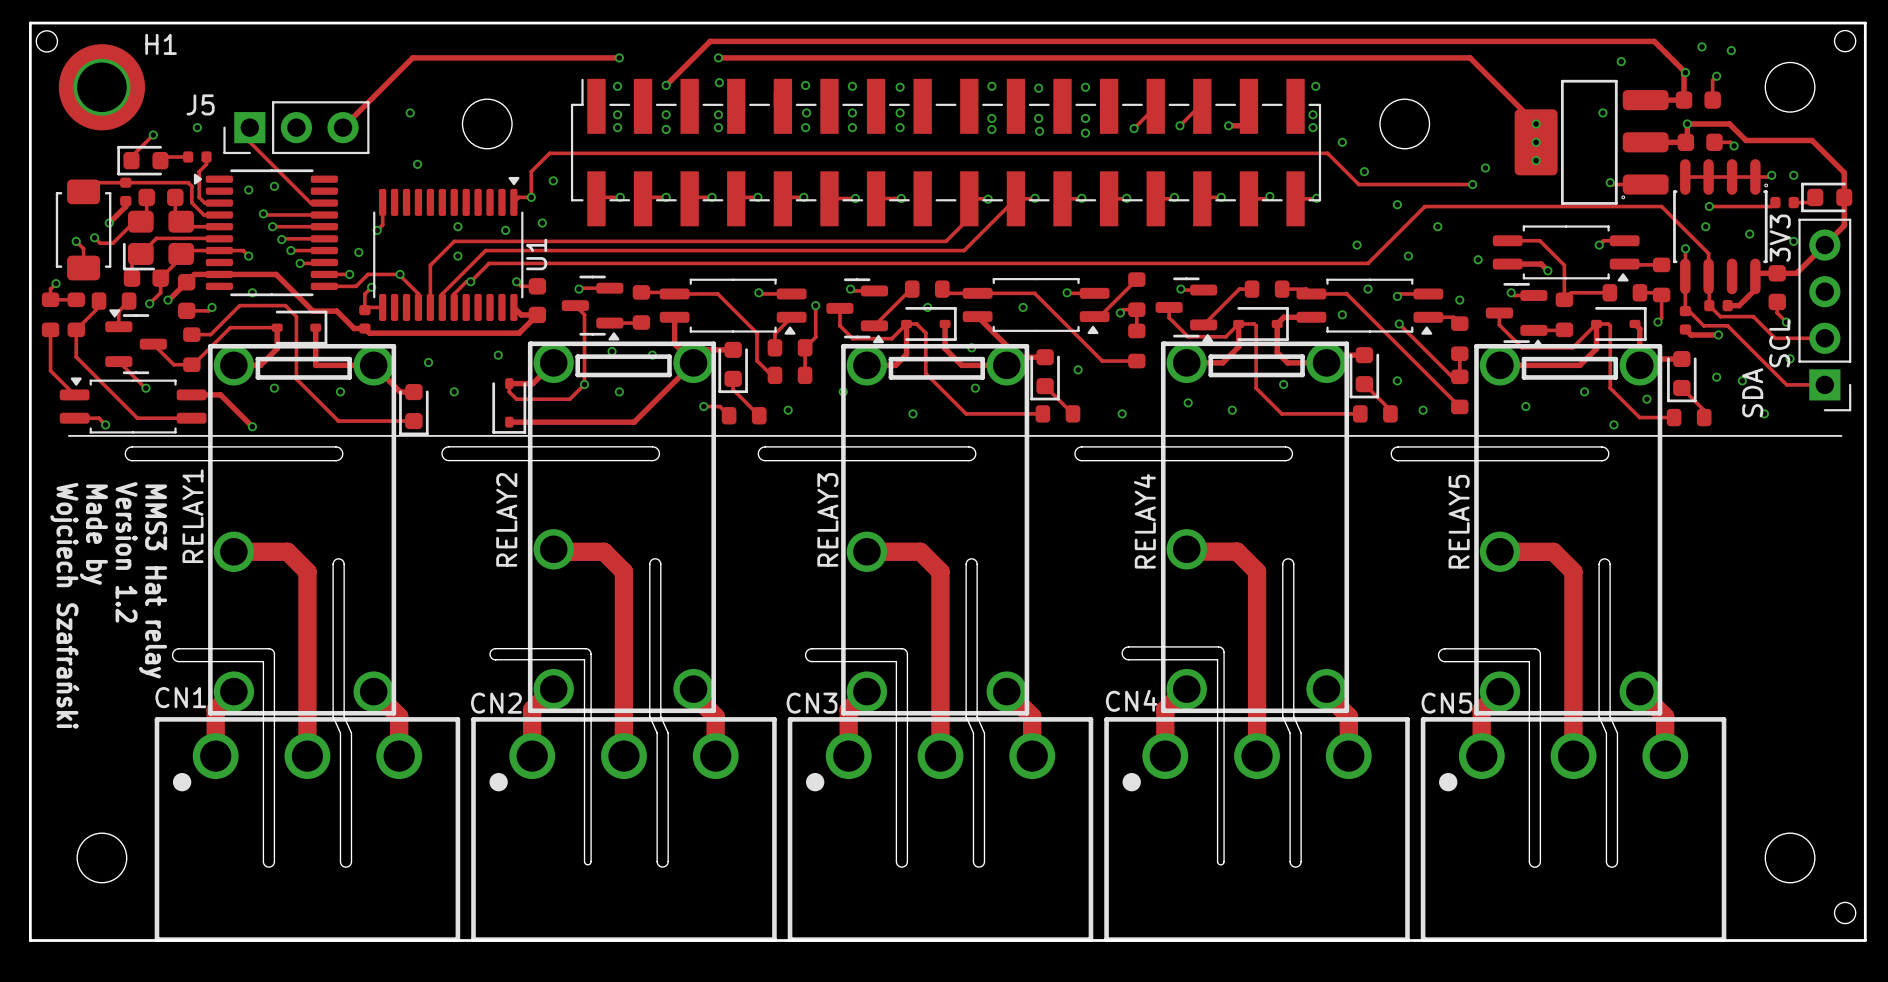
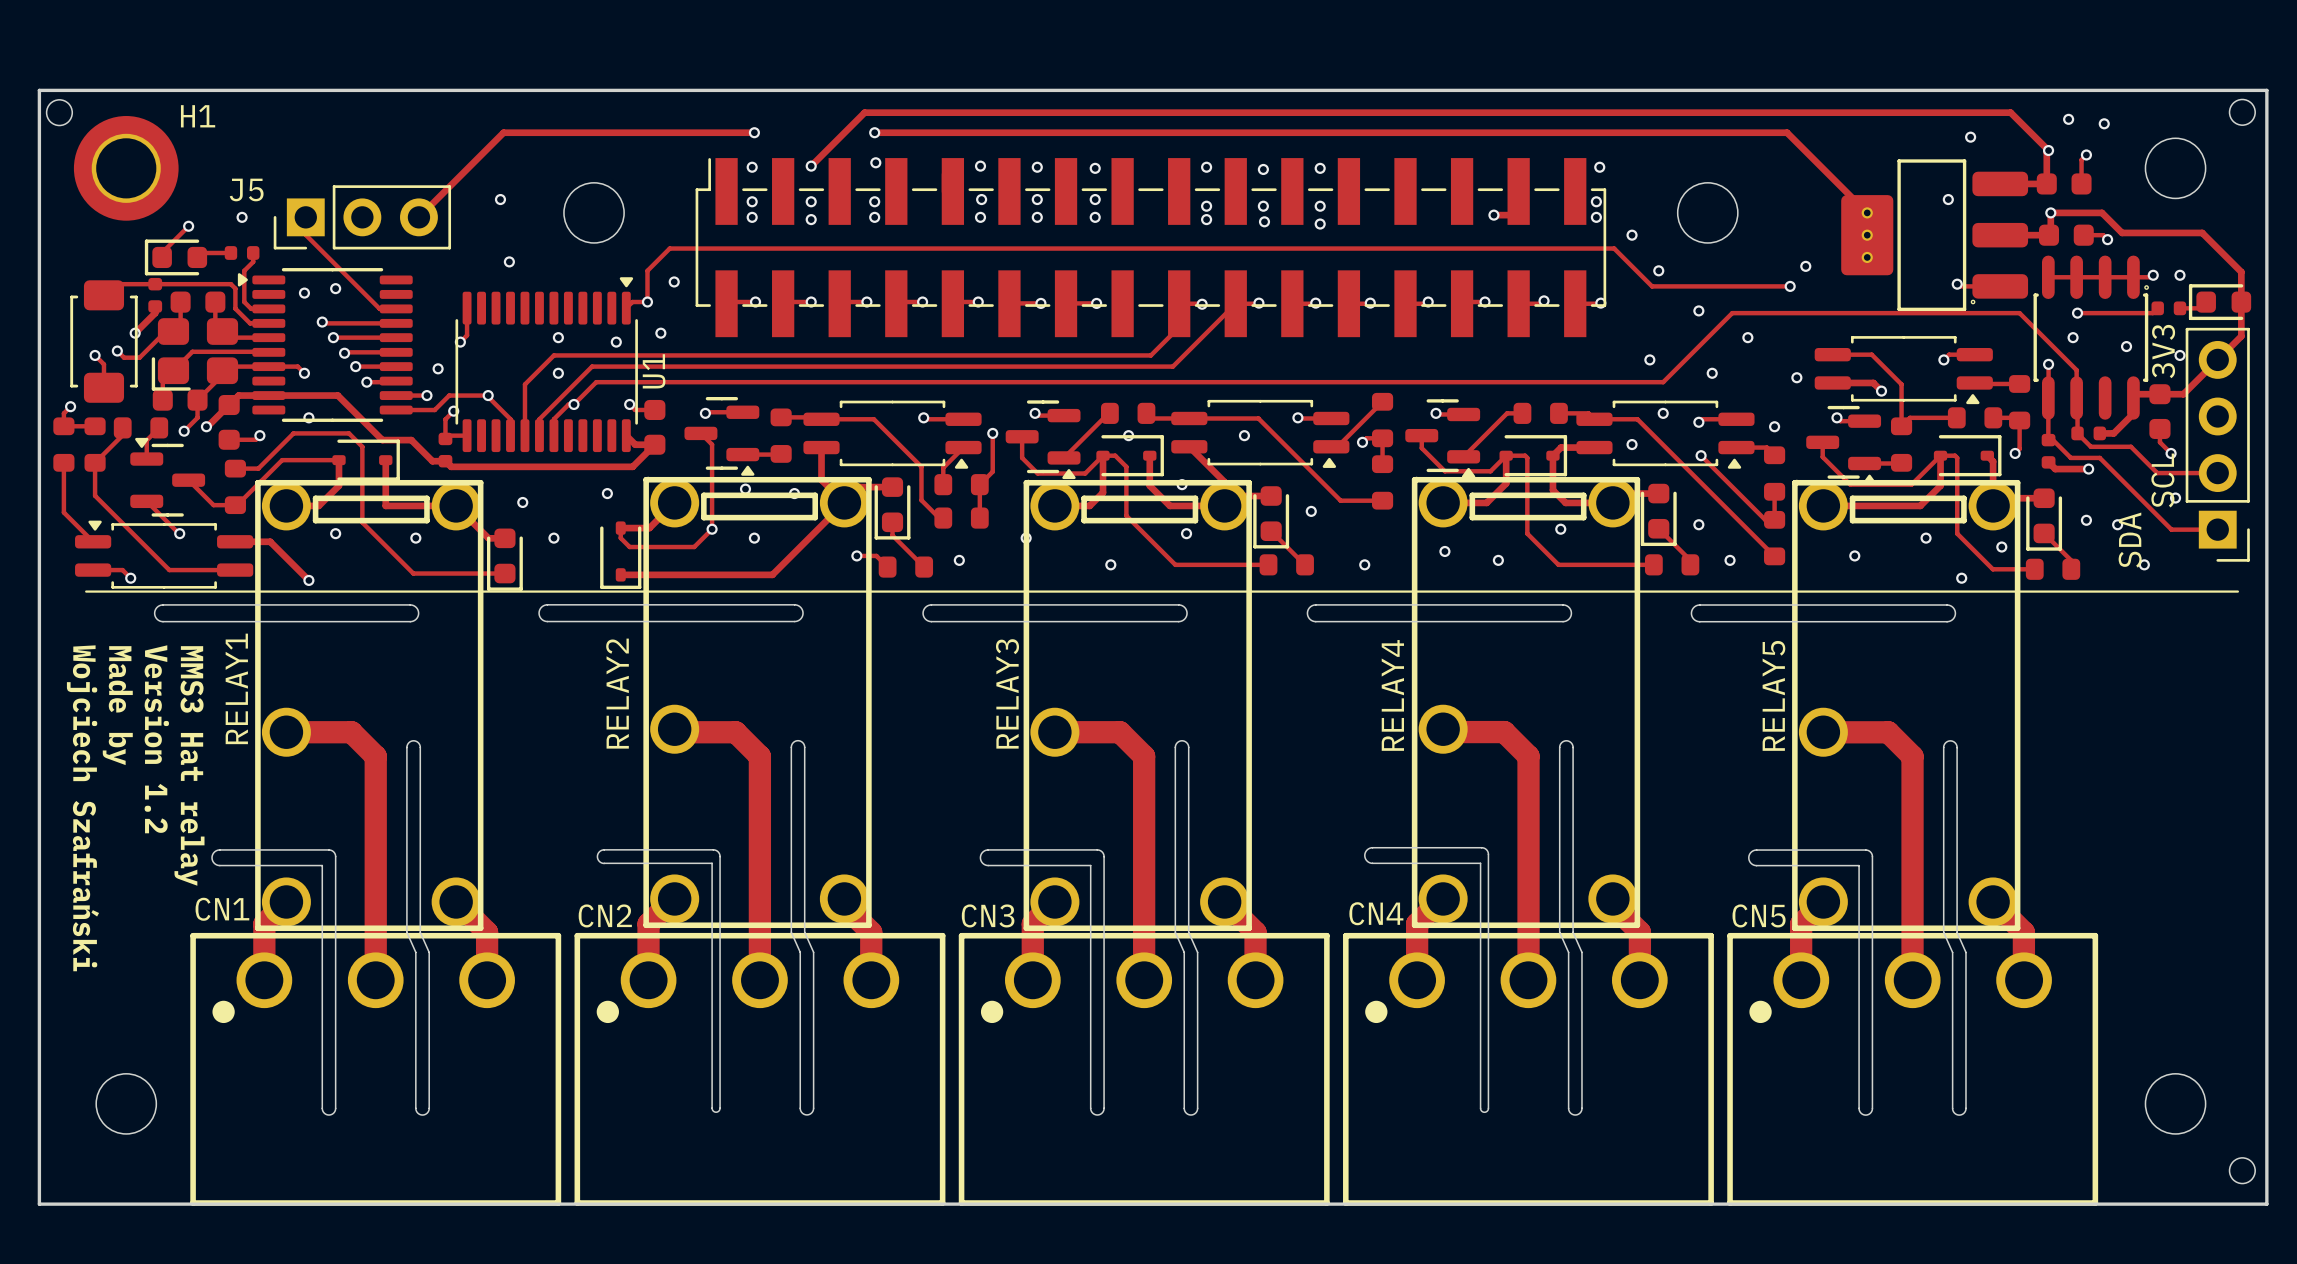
track: (1155, 106) (1134, 128) -> none
track: (1202, 106) (1199, 106) (1179, 125) -> none
via: (1179, 125) -> none
via: (1134, 128) -> none

